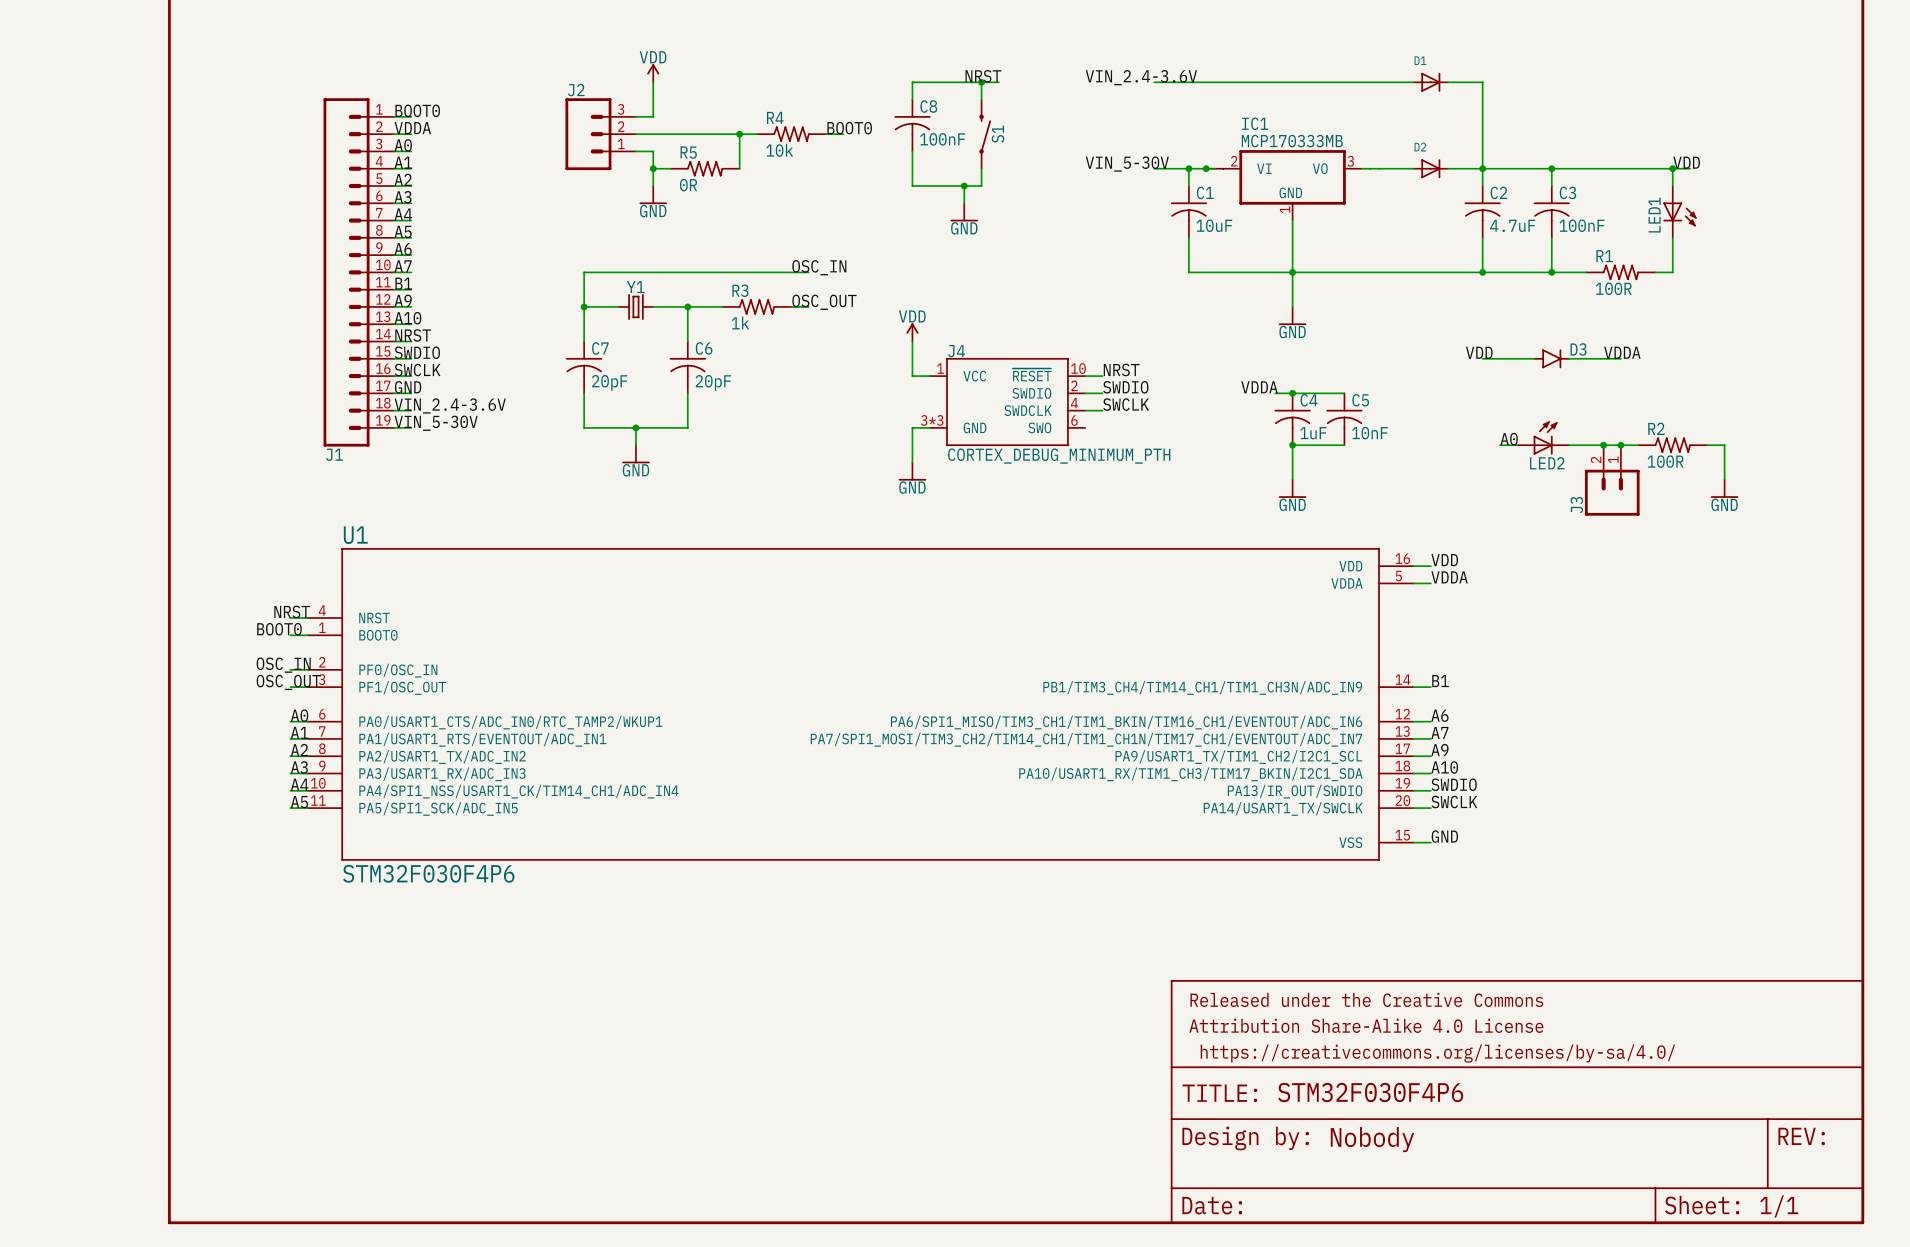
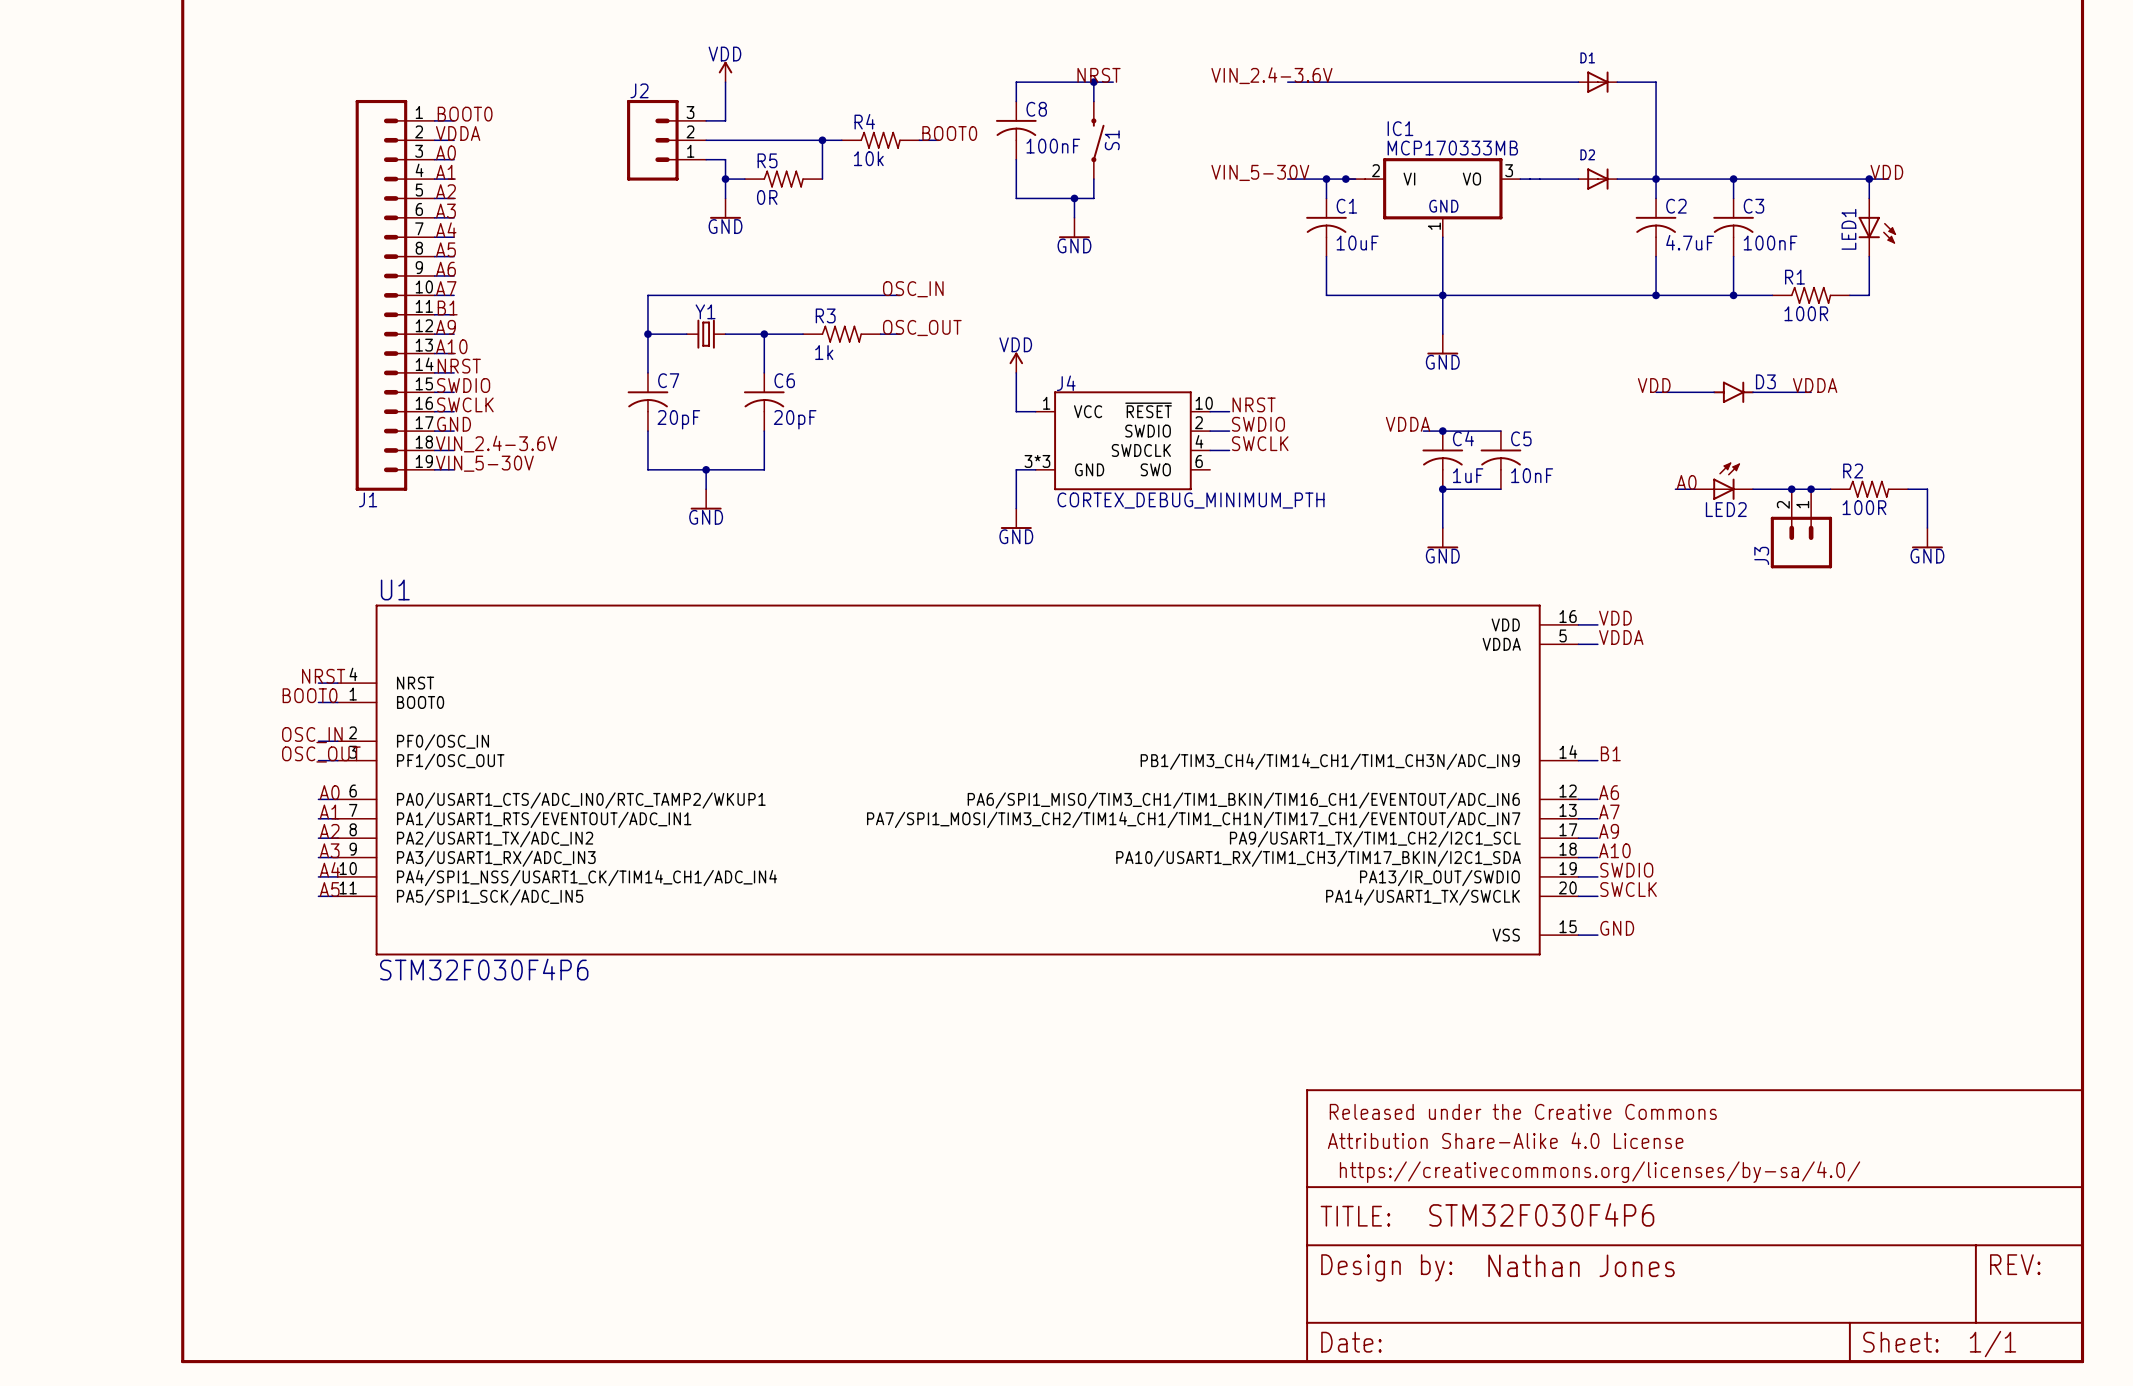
part text: Nobody (1372, 1139) -> Nathan Jones (1581, 1265)

